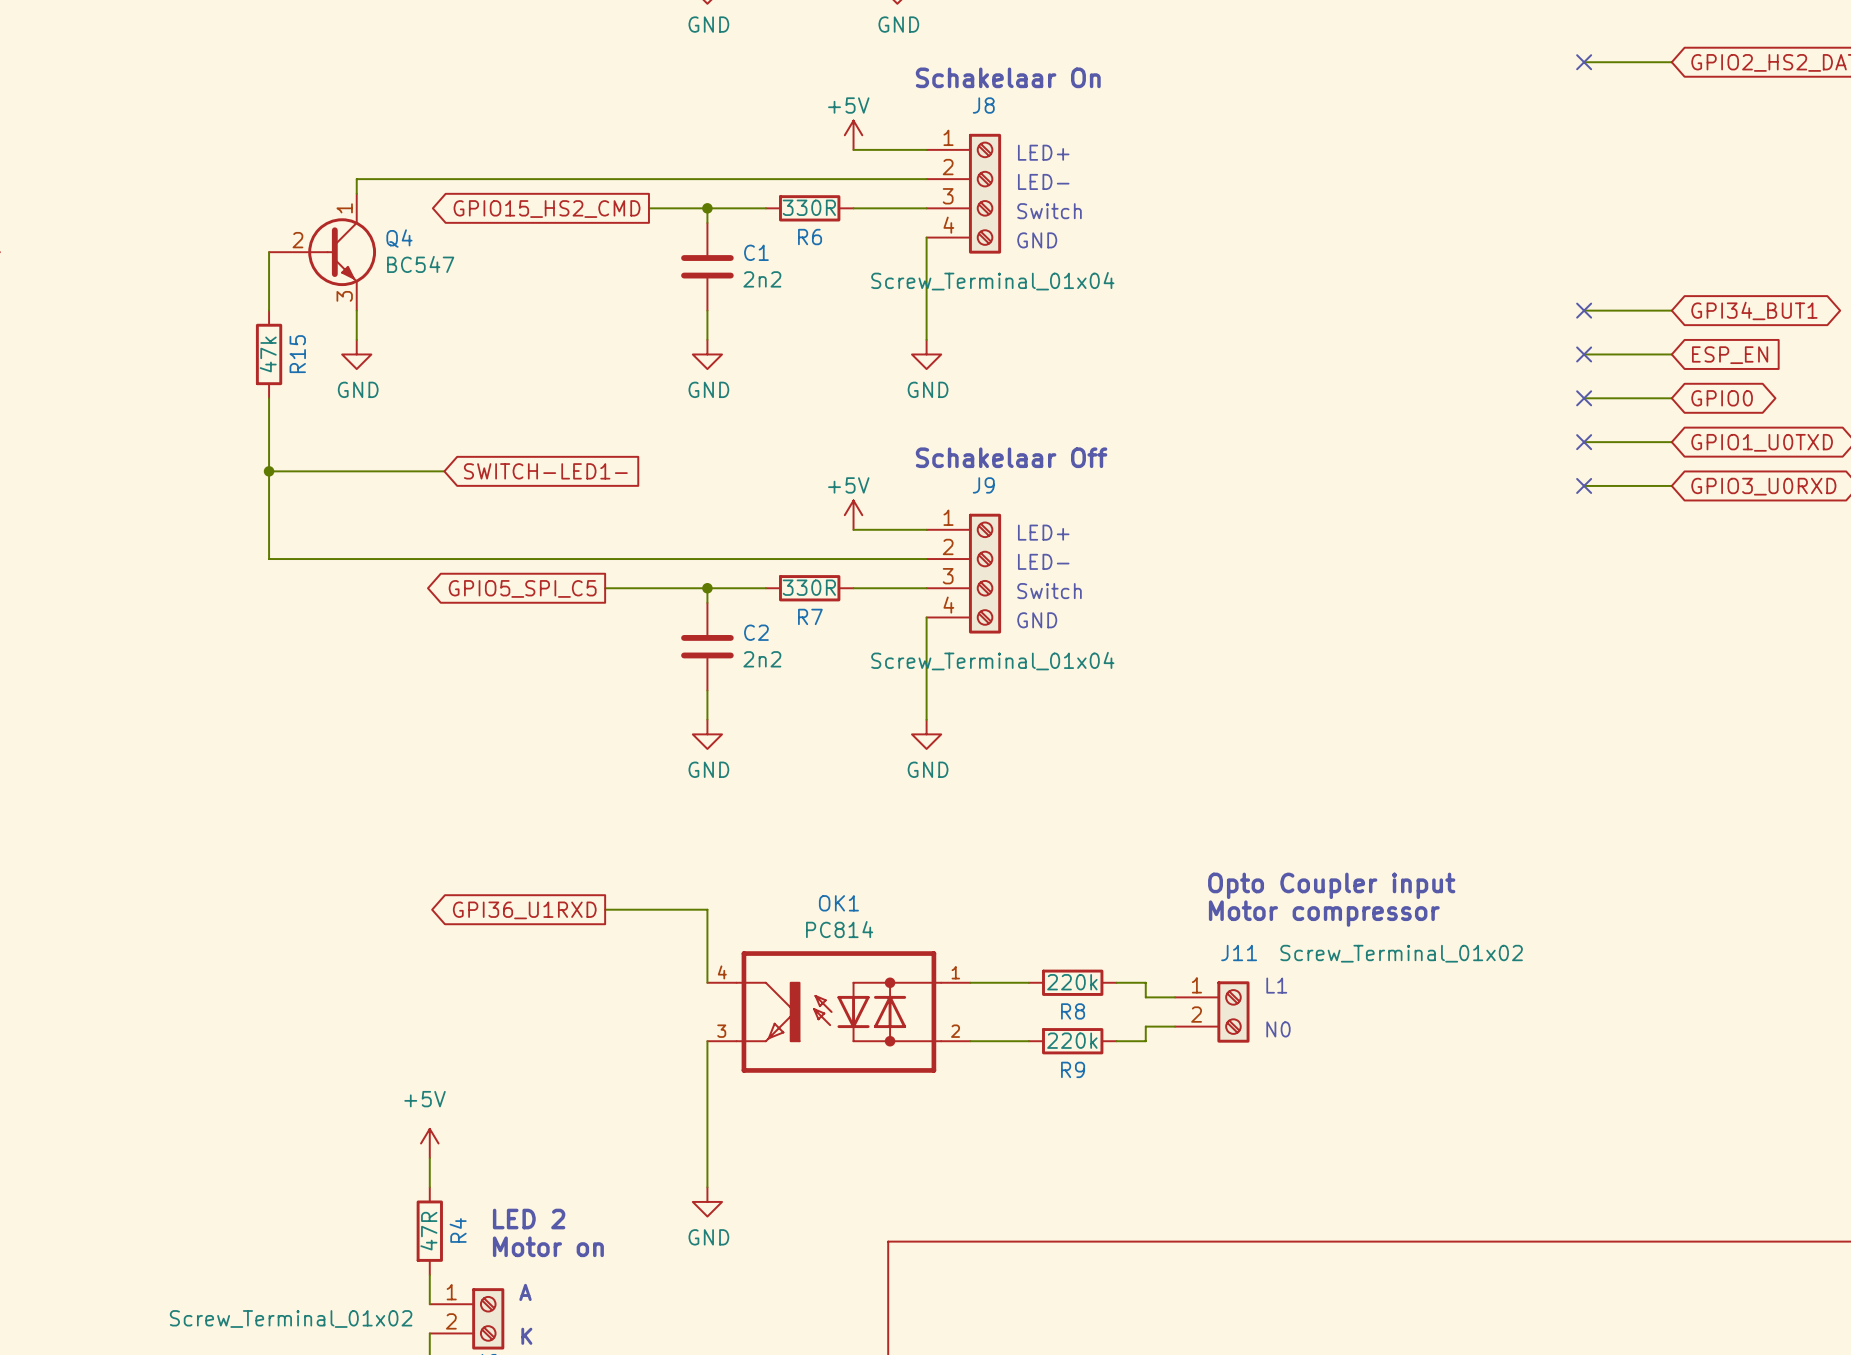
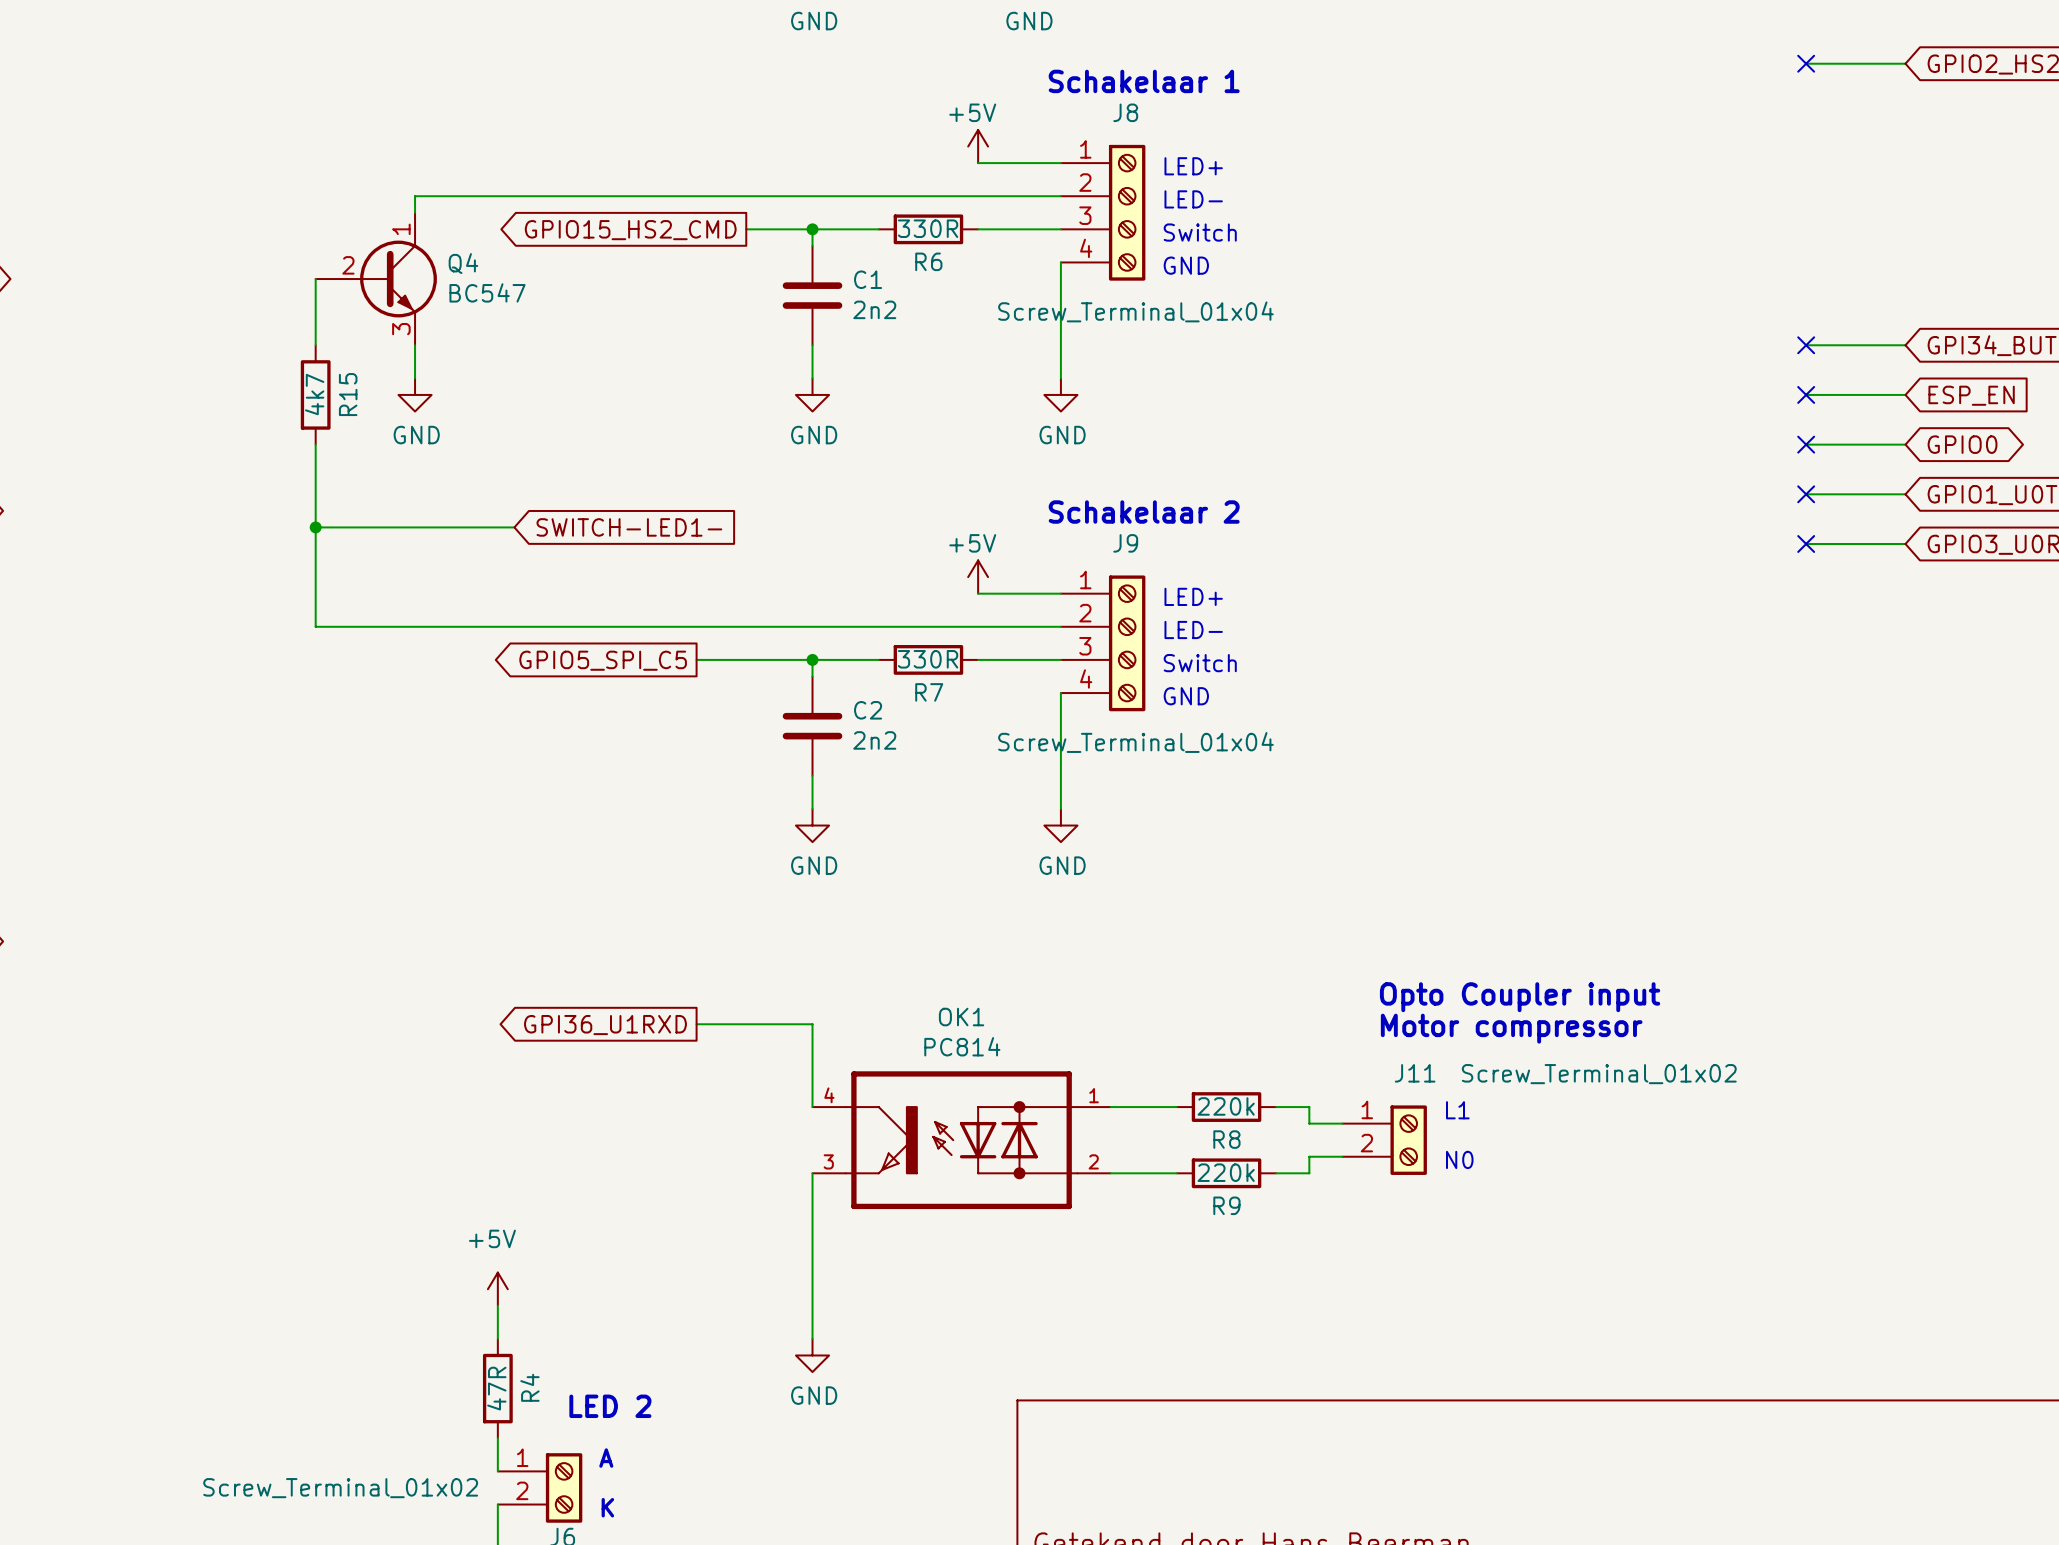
text: Schakelaar On (1008, 77) -> Schakelaar 1 (1144, 81)
R15 value: 47k (268, 354) -> 4k7 (314, 394)
text: Schakelaar Off (1011, 457) -> Schakelaar 2 (1144, 512)
text: LED 2 (529, 1219) -> none
text: Motor on (548, 1246) -> LED 2 (610, 1406)

